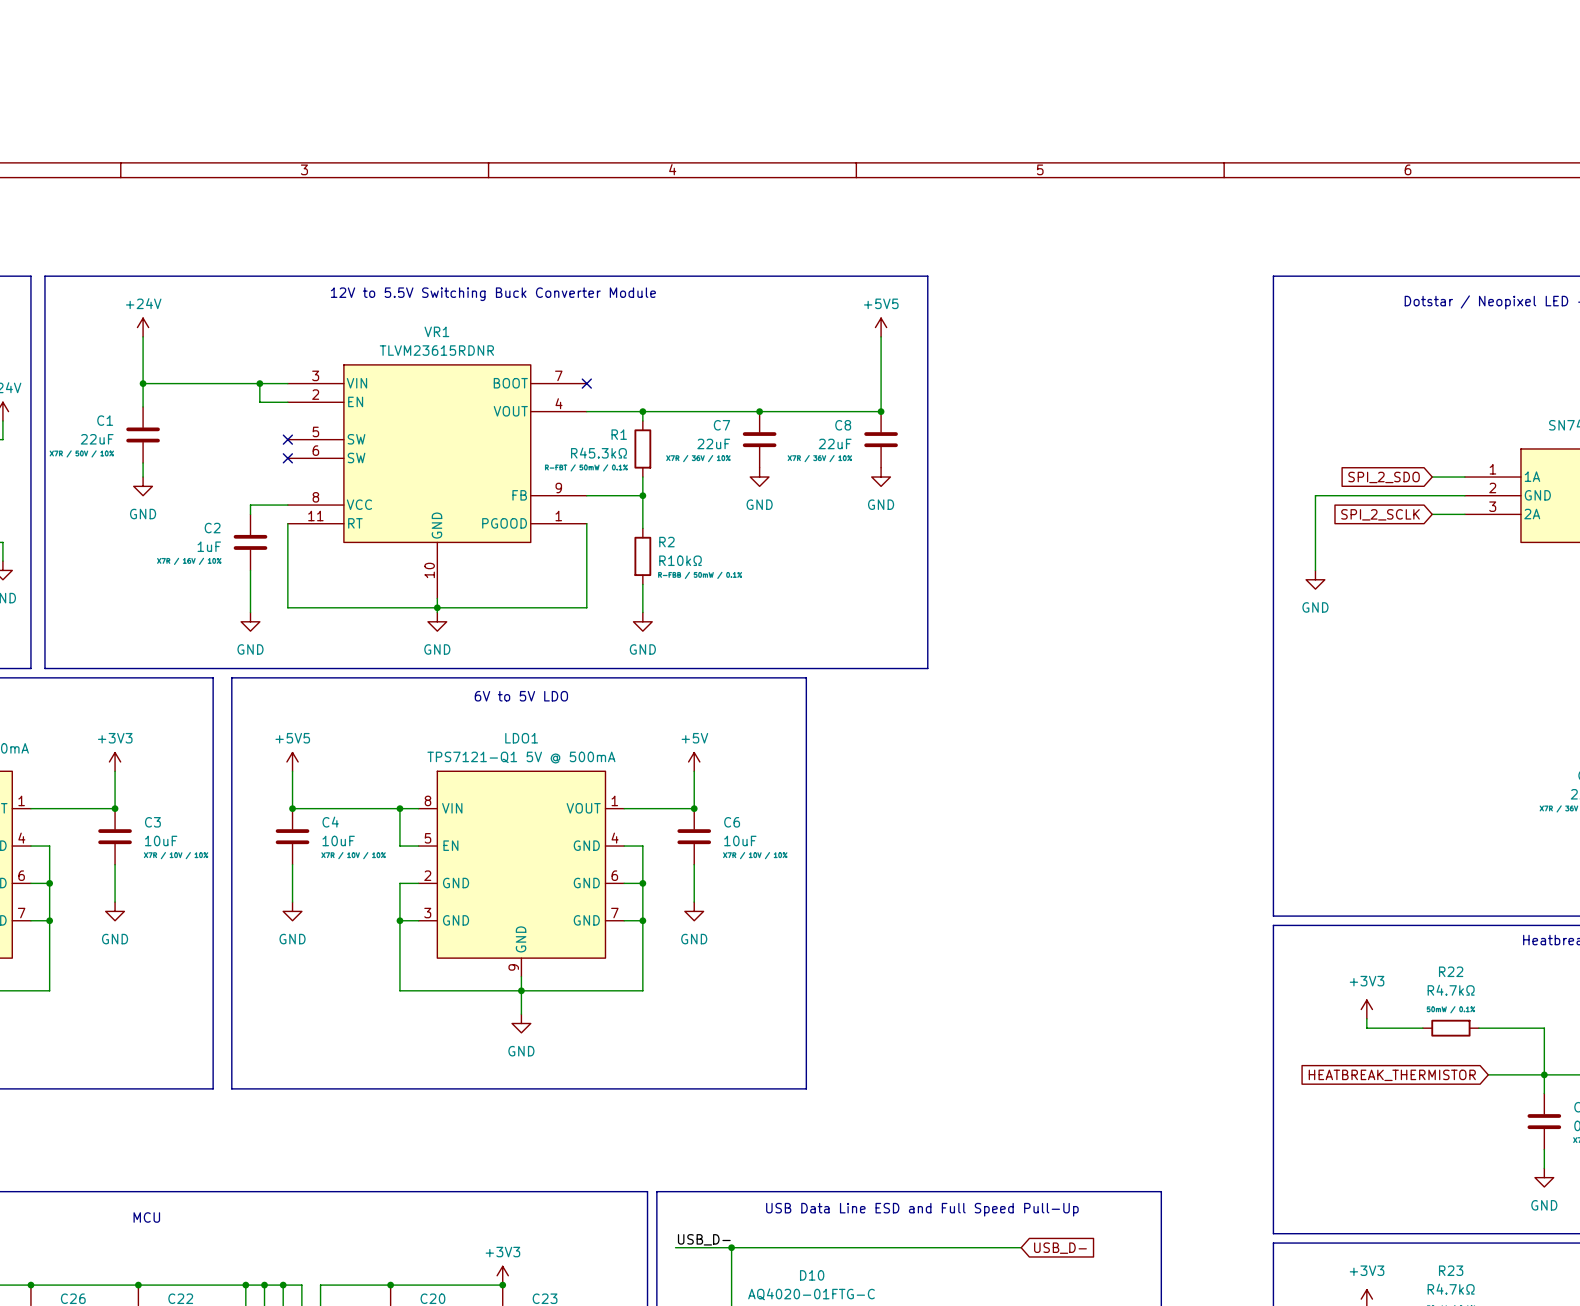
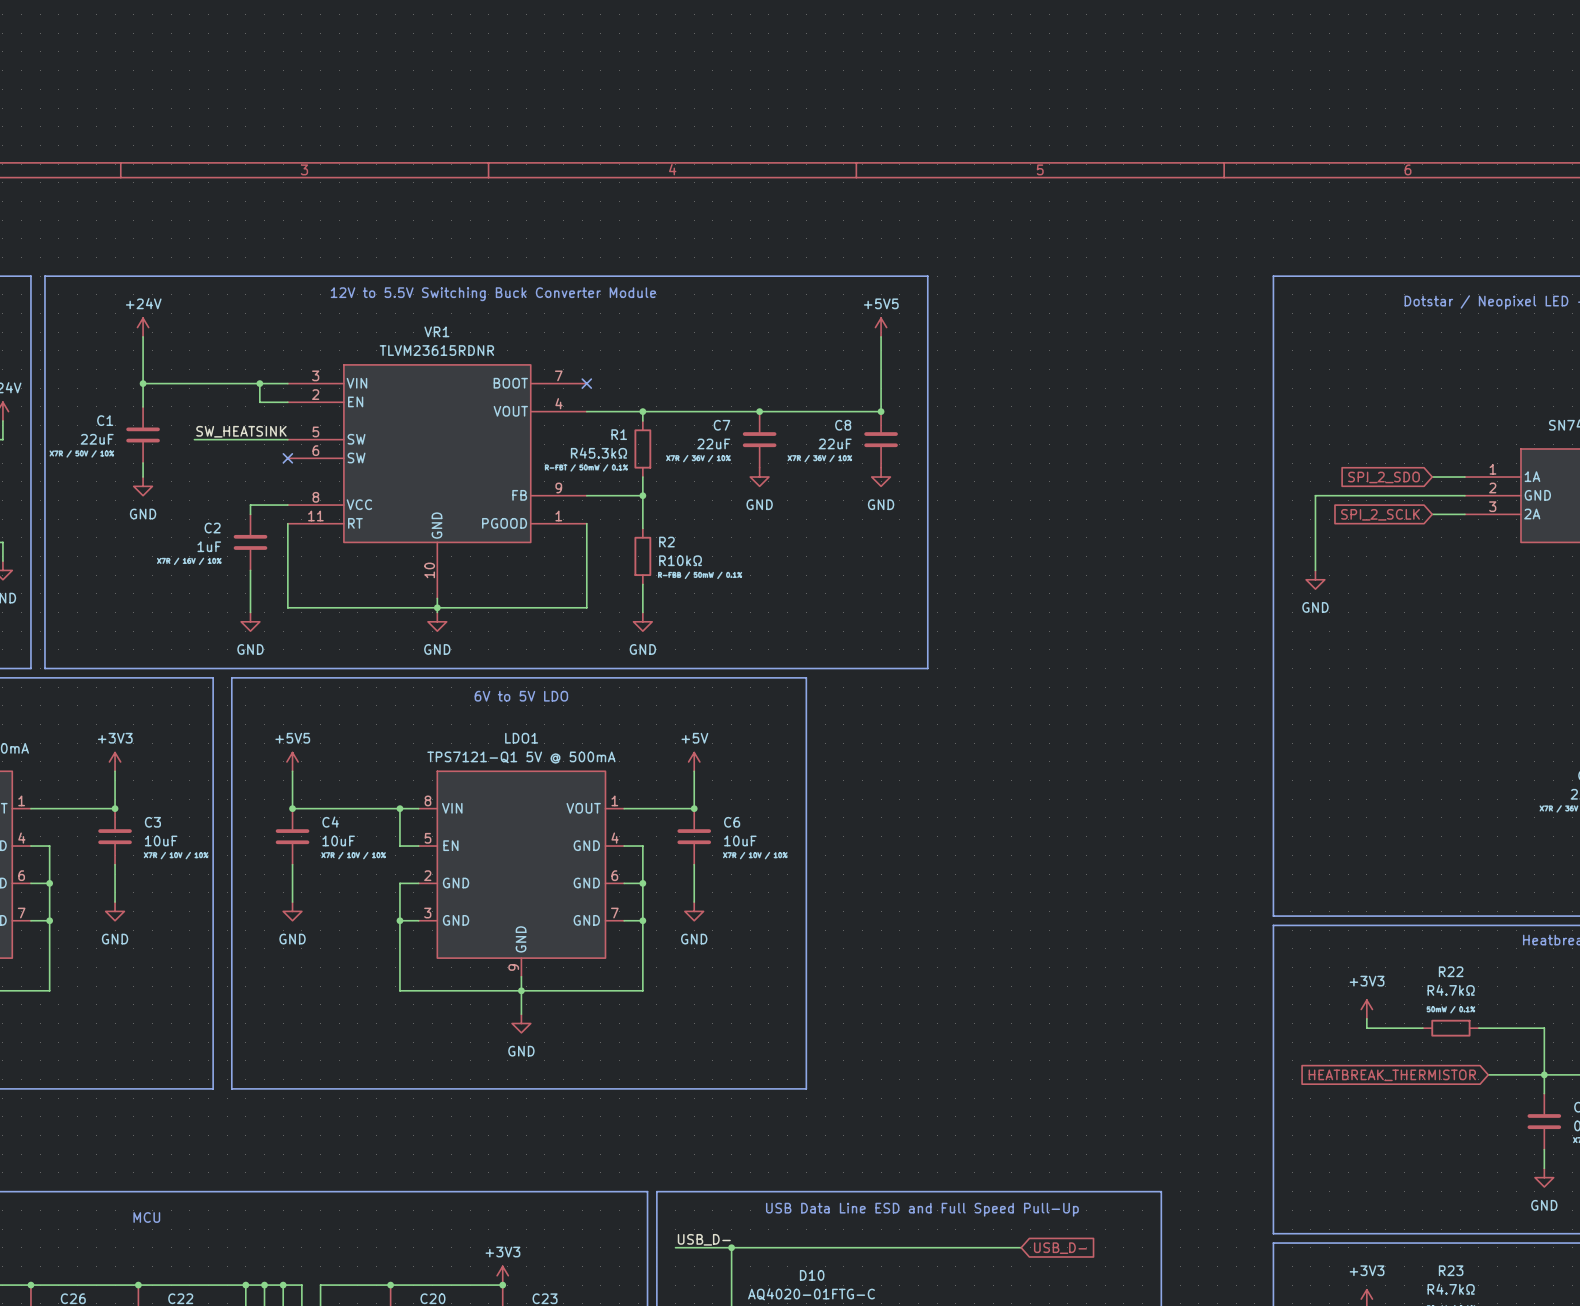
label: none -> SW_HEATSINK (241, 431)
wire: none -> (194, 439) (287, 439)
no-connect mark: (287, 439) -> none

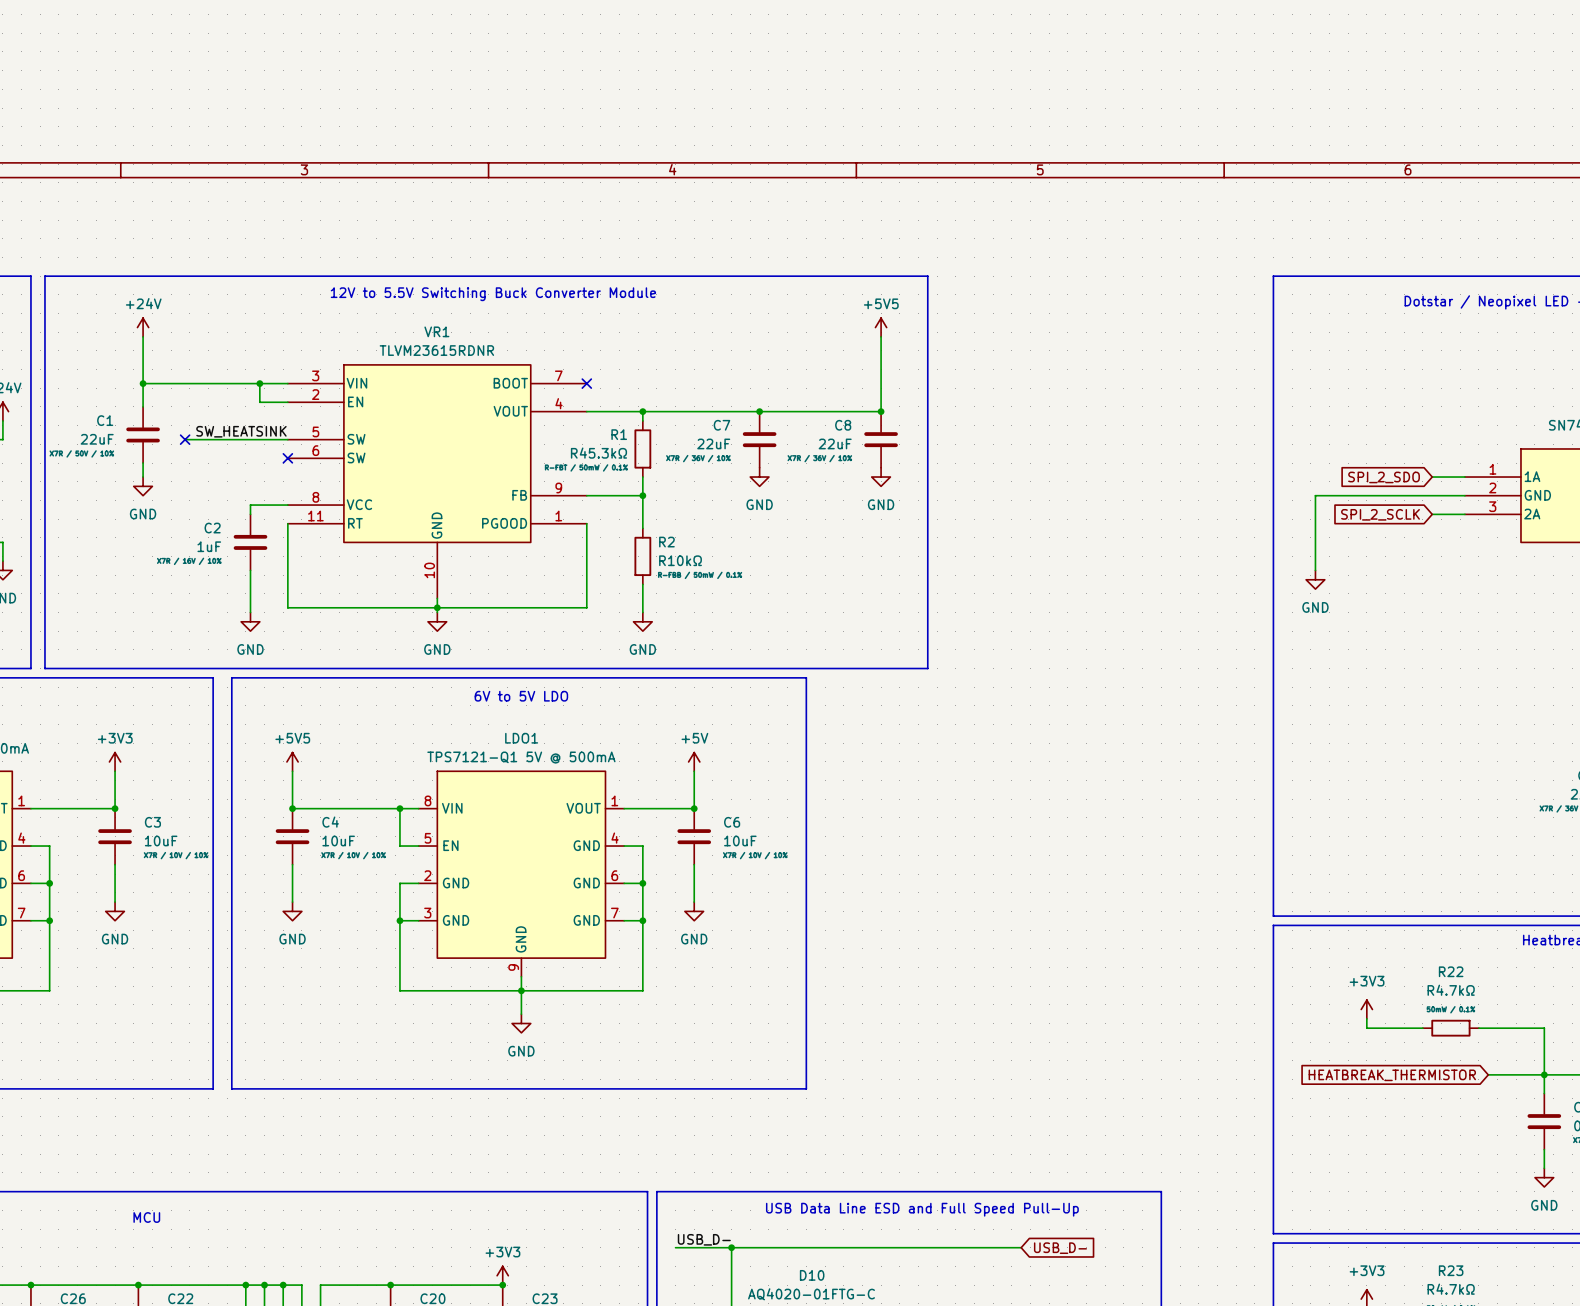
wire: none -> (185, 439) (194, 439)
no-connect mark: none -> (185, 439)

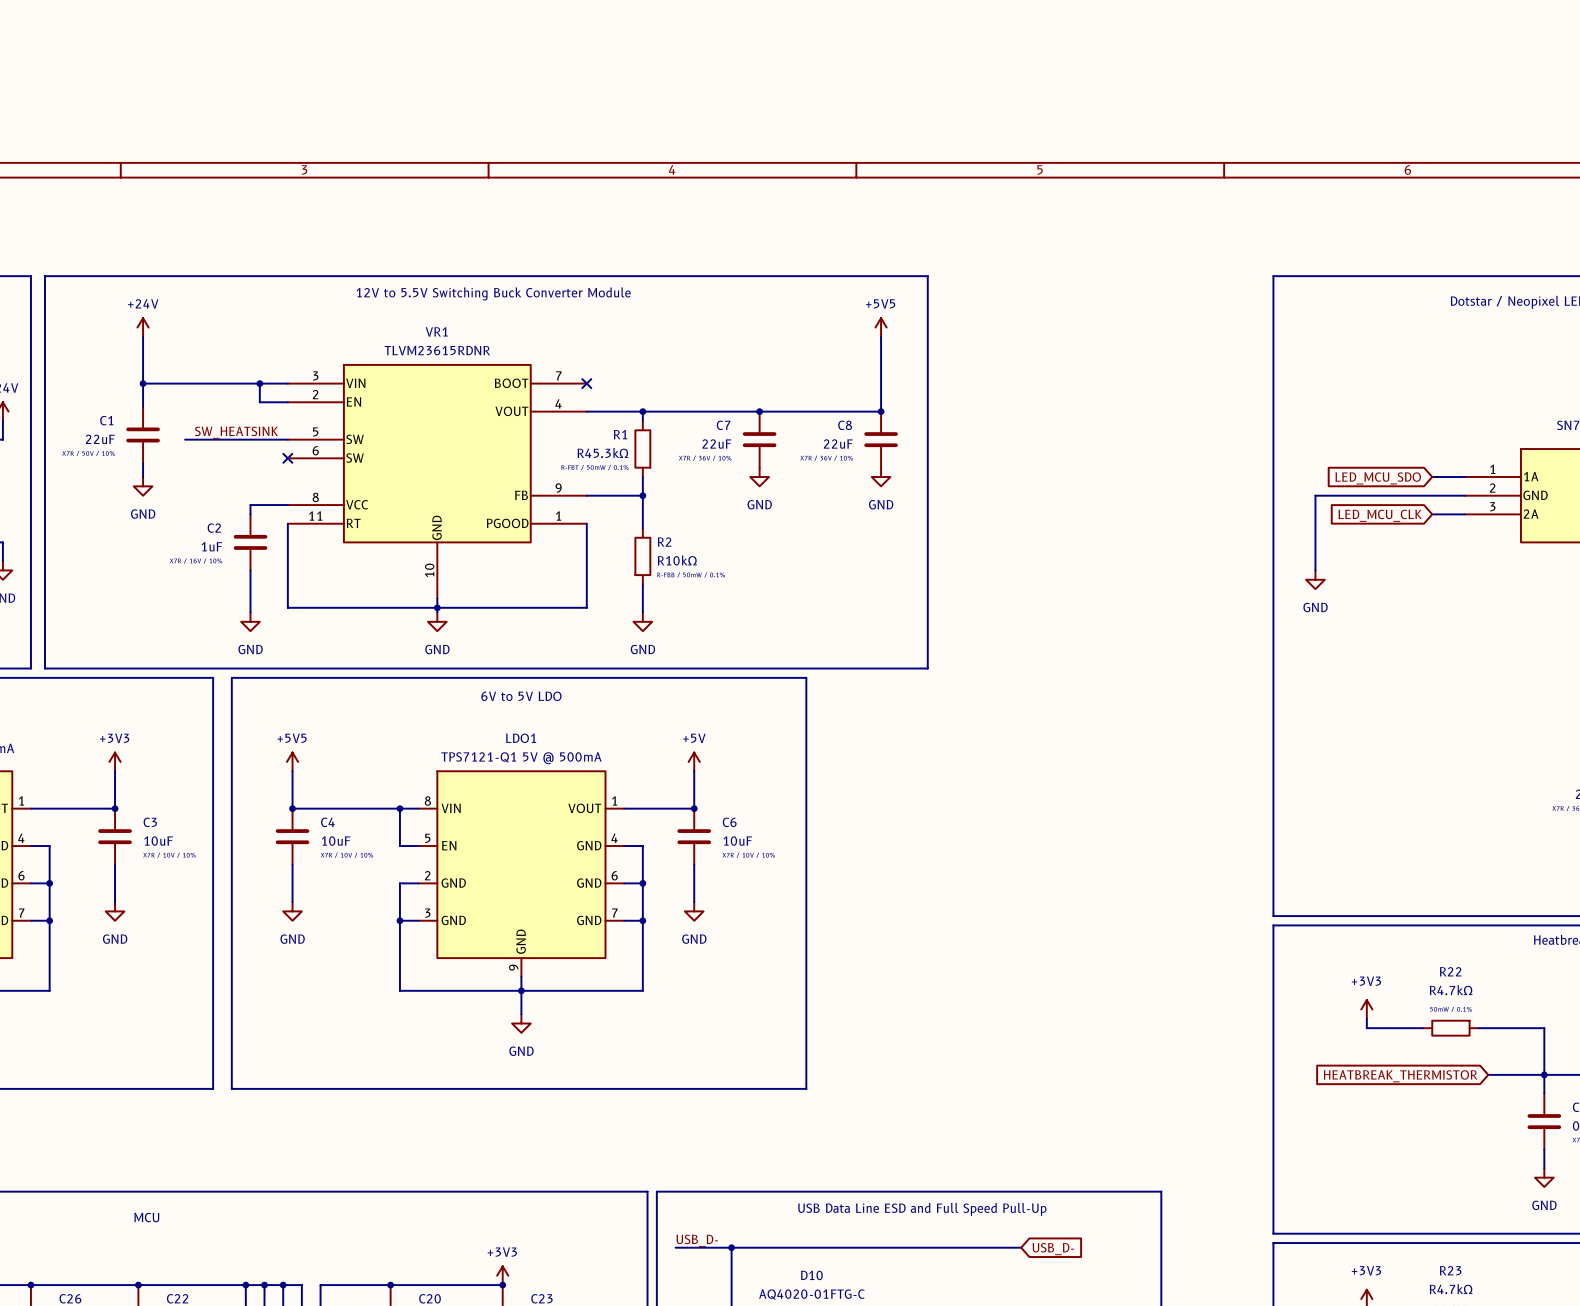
no-connect mark: (185, 439) -> none
global label: SPI_2_SDO (1384, 477) -> LED_MCU_SDO (1378, 478)
global label: SPI_2_SCLK (1380, 514) -> LED_MCU_CLK (1380, 515)

